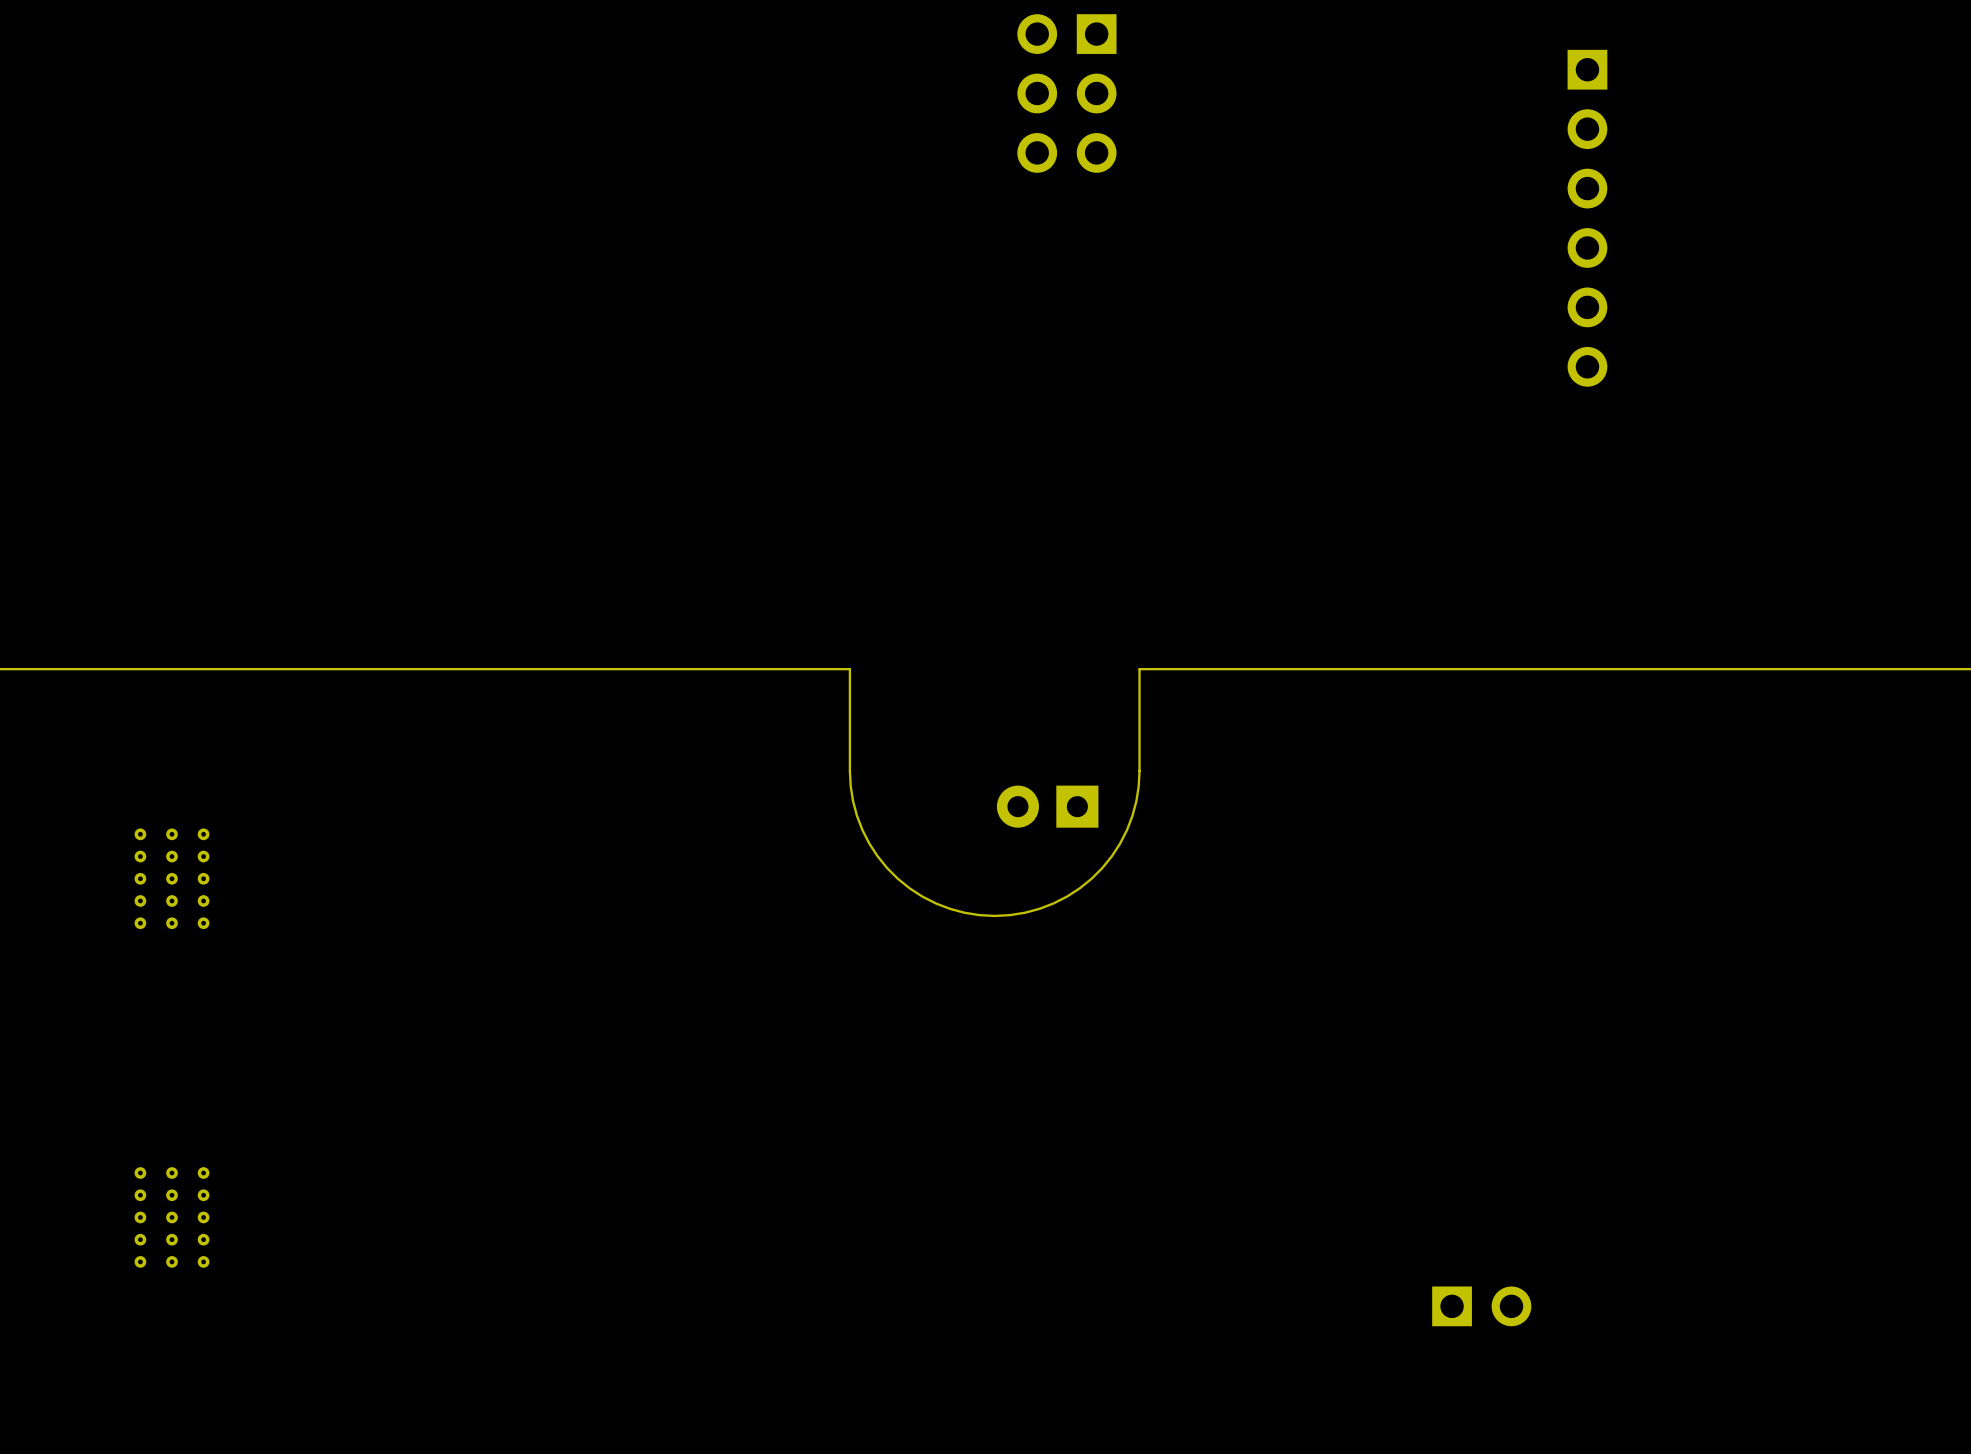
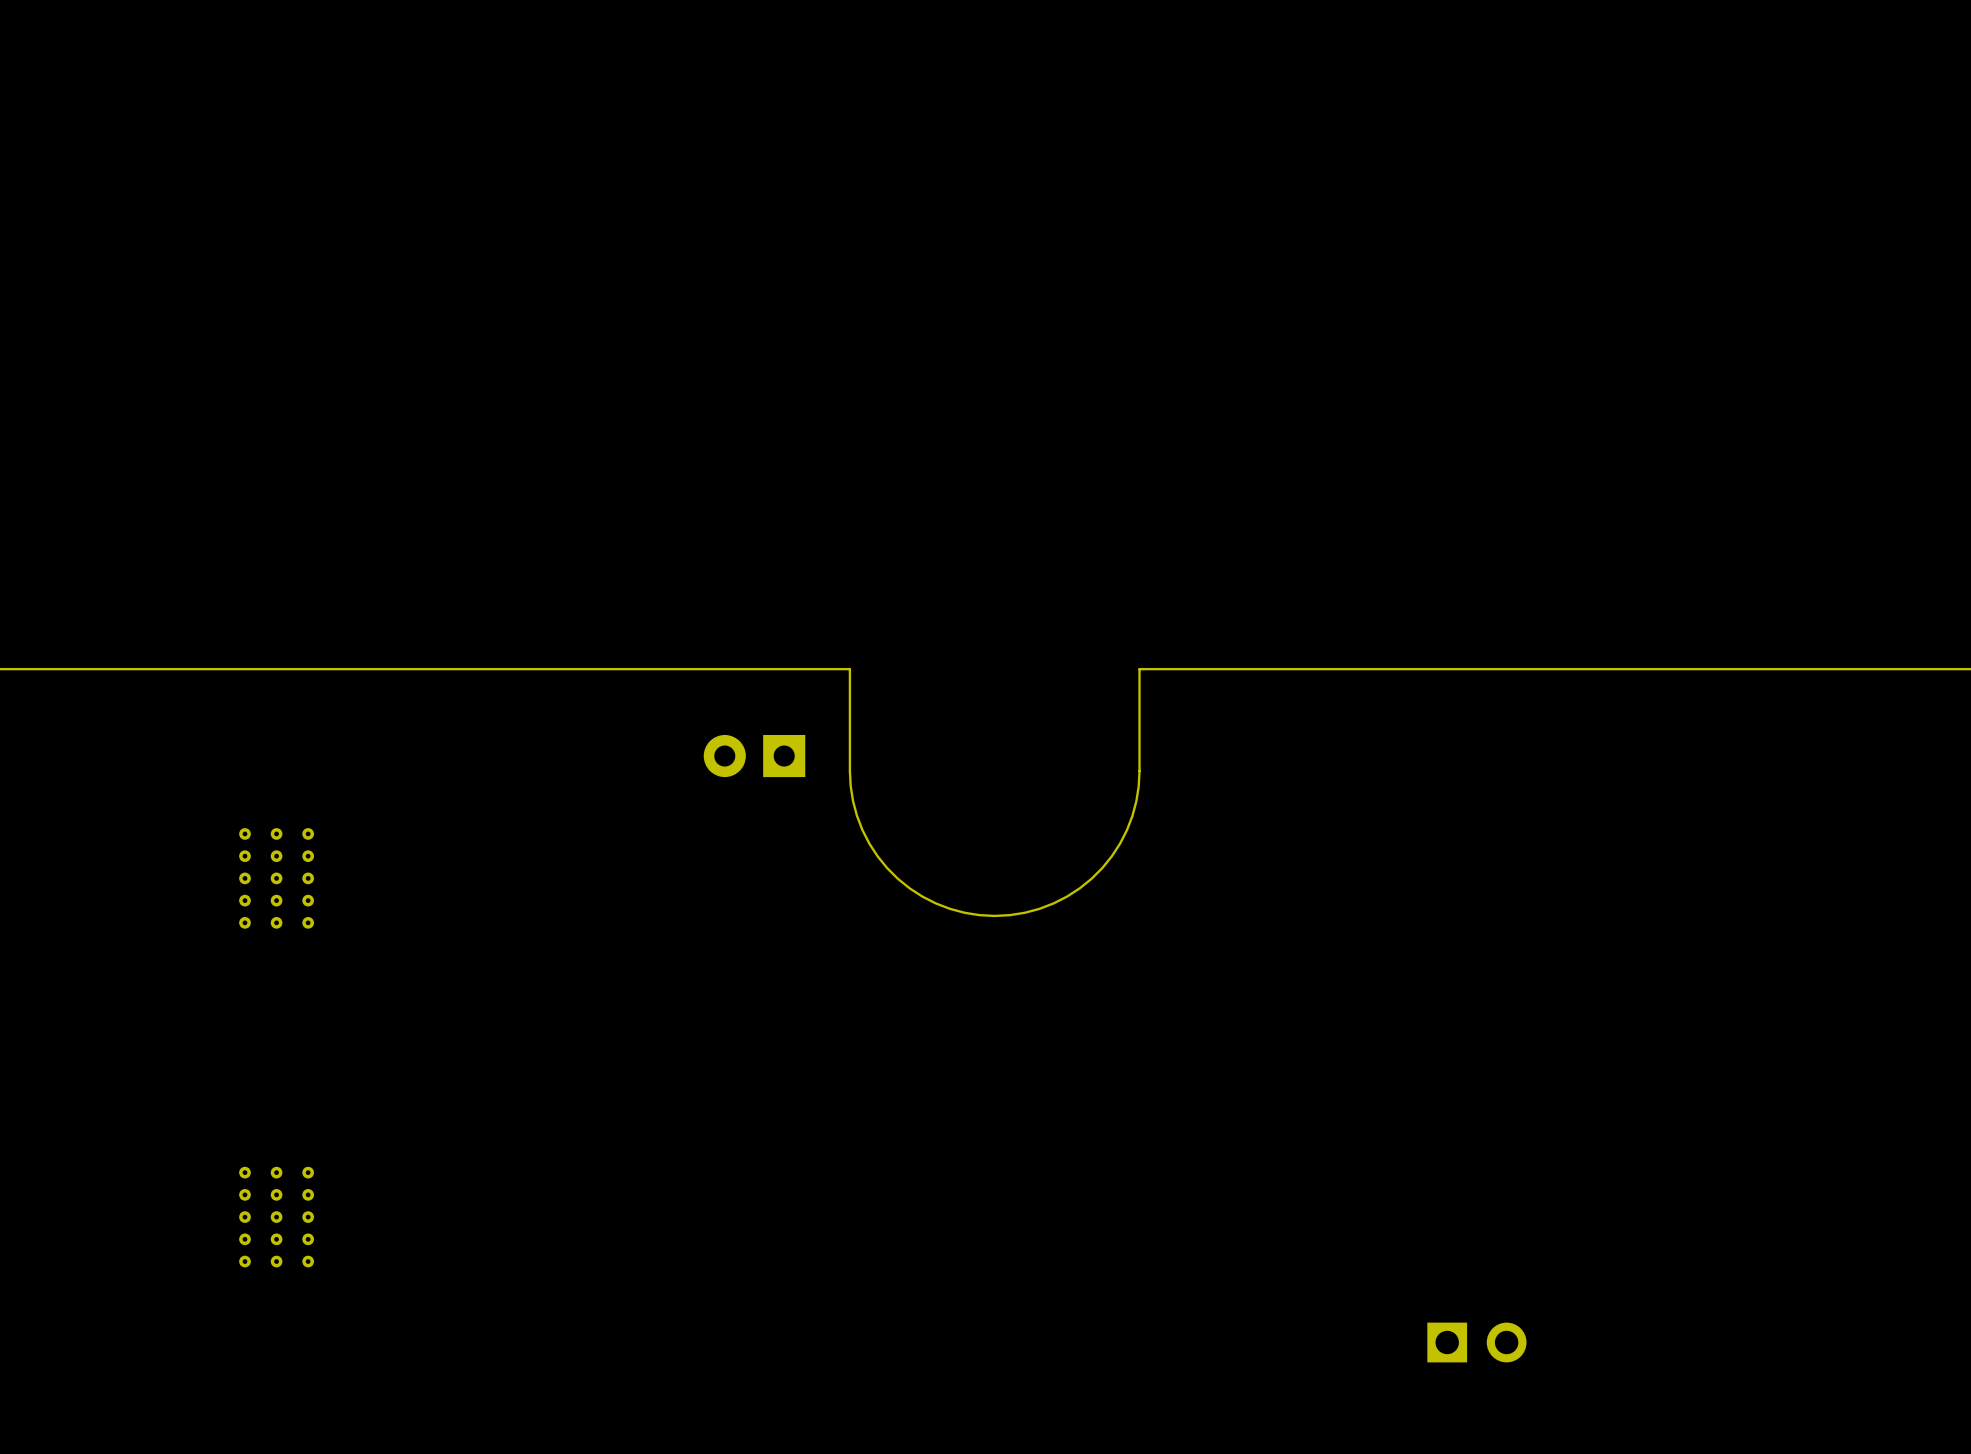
part: (1066, 93) -> none
part: (1587, 218) -> none
part position: (1047, 806) -> (754, 756)
part position: (171, 878) -> (276, 878)
part position: (171, 1217) -> (276, 1217)
part position: (1481, 1306) -> (1476, 1342)

